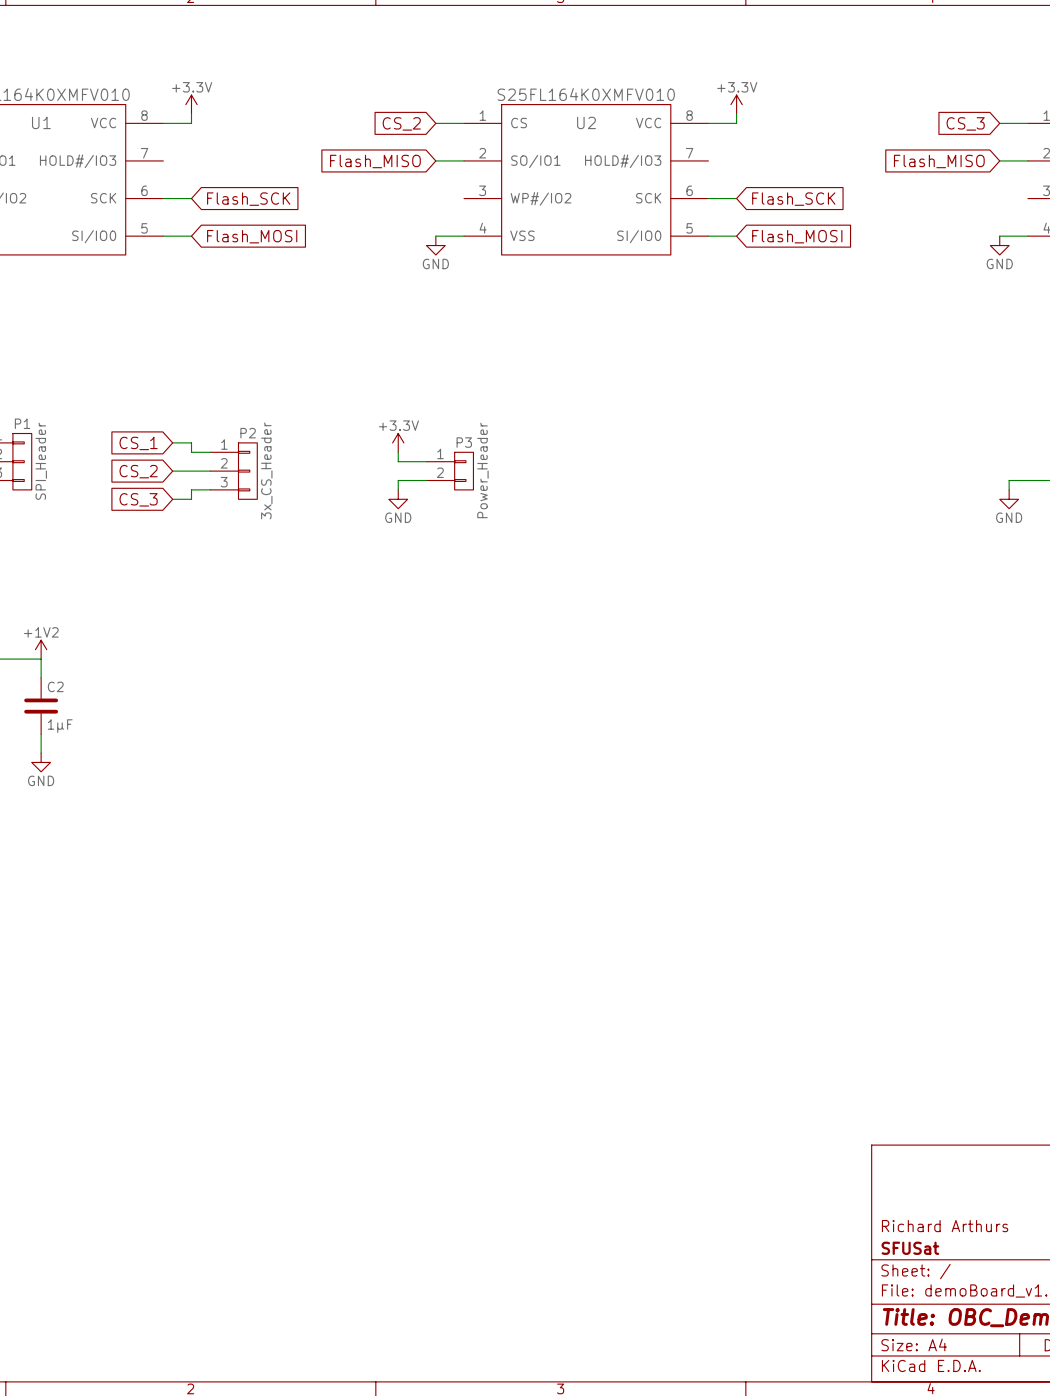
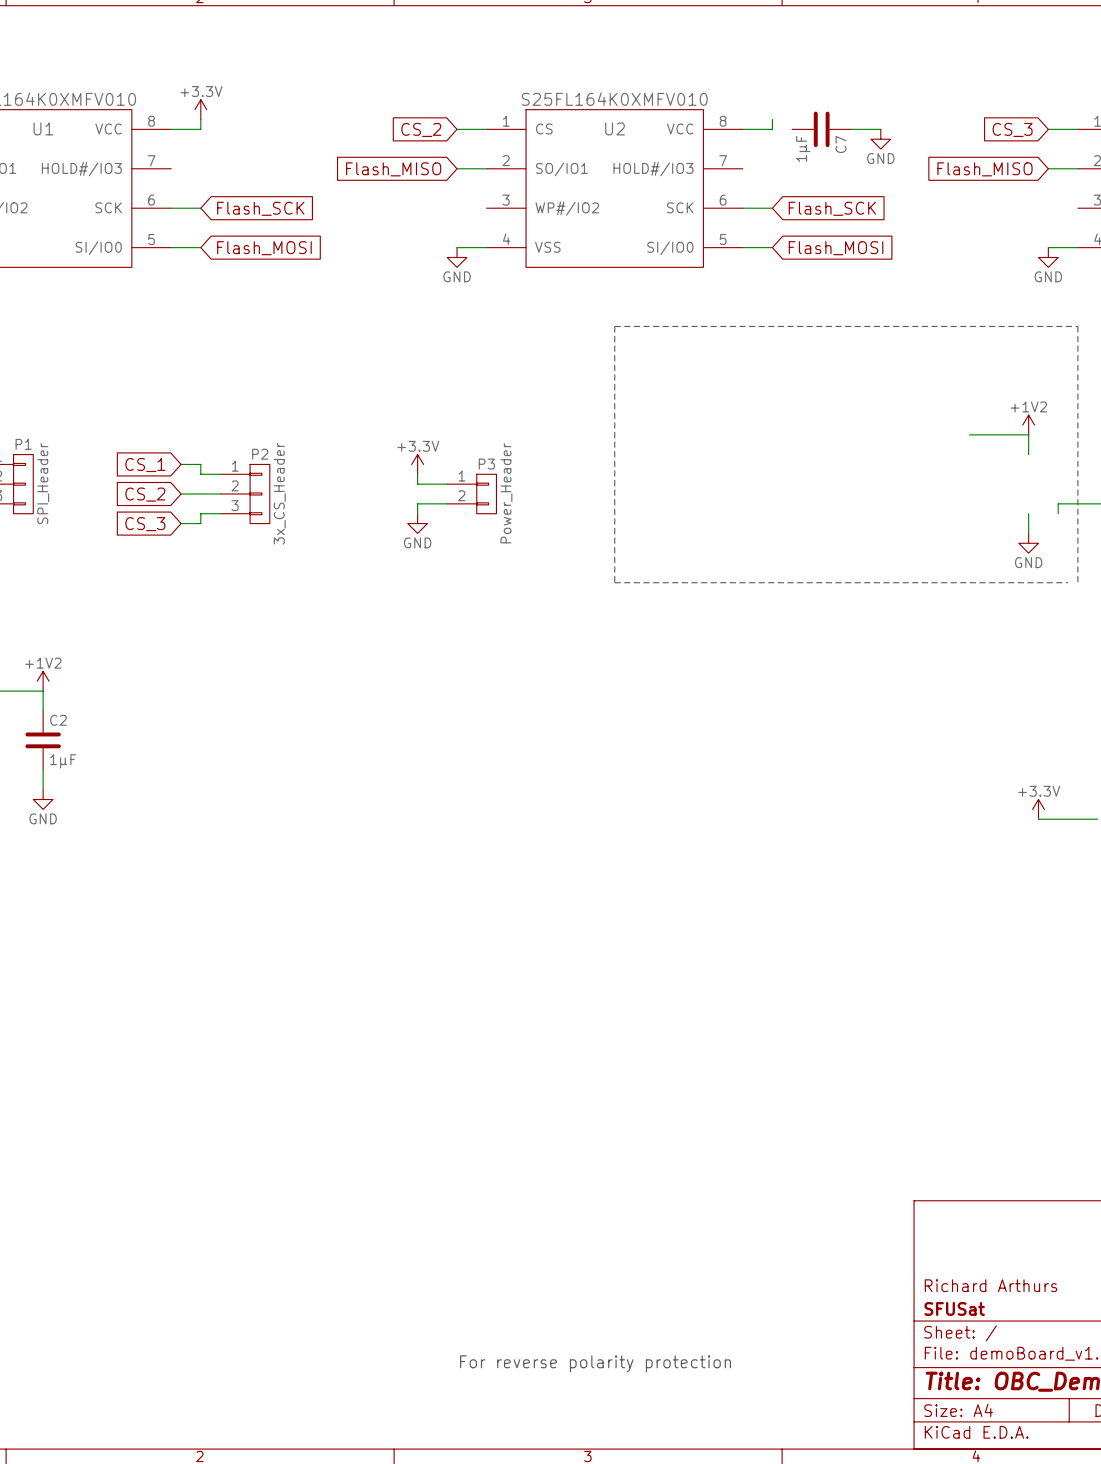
power symbol: +3.3V (736, 104) -> none
C7: none -> 1µF (821, 129)
wire: none -> (851, 129) (880, 129)
power symbol: none -> GND (880, 139)
power symbol: none -> +1V2 (1028, 425)
wire: none -> (969, 434) (1028, 434) (1028, 454)
wire: none -> (1028, 513) (1028, 533)
power symbol position: GND (1009, 499) -> GND (1028, 543)
line: none -> (1068, 582) (614, 582) (614, 326) (1077, 326) (1077, 582)
power symbol: none -> +3.3V (1038, 809)
wire: none -> (1038, 819) (1097, 819)
text: none -> For reverse polarity protection (595, 1363)

